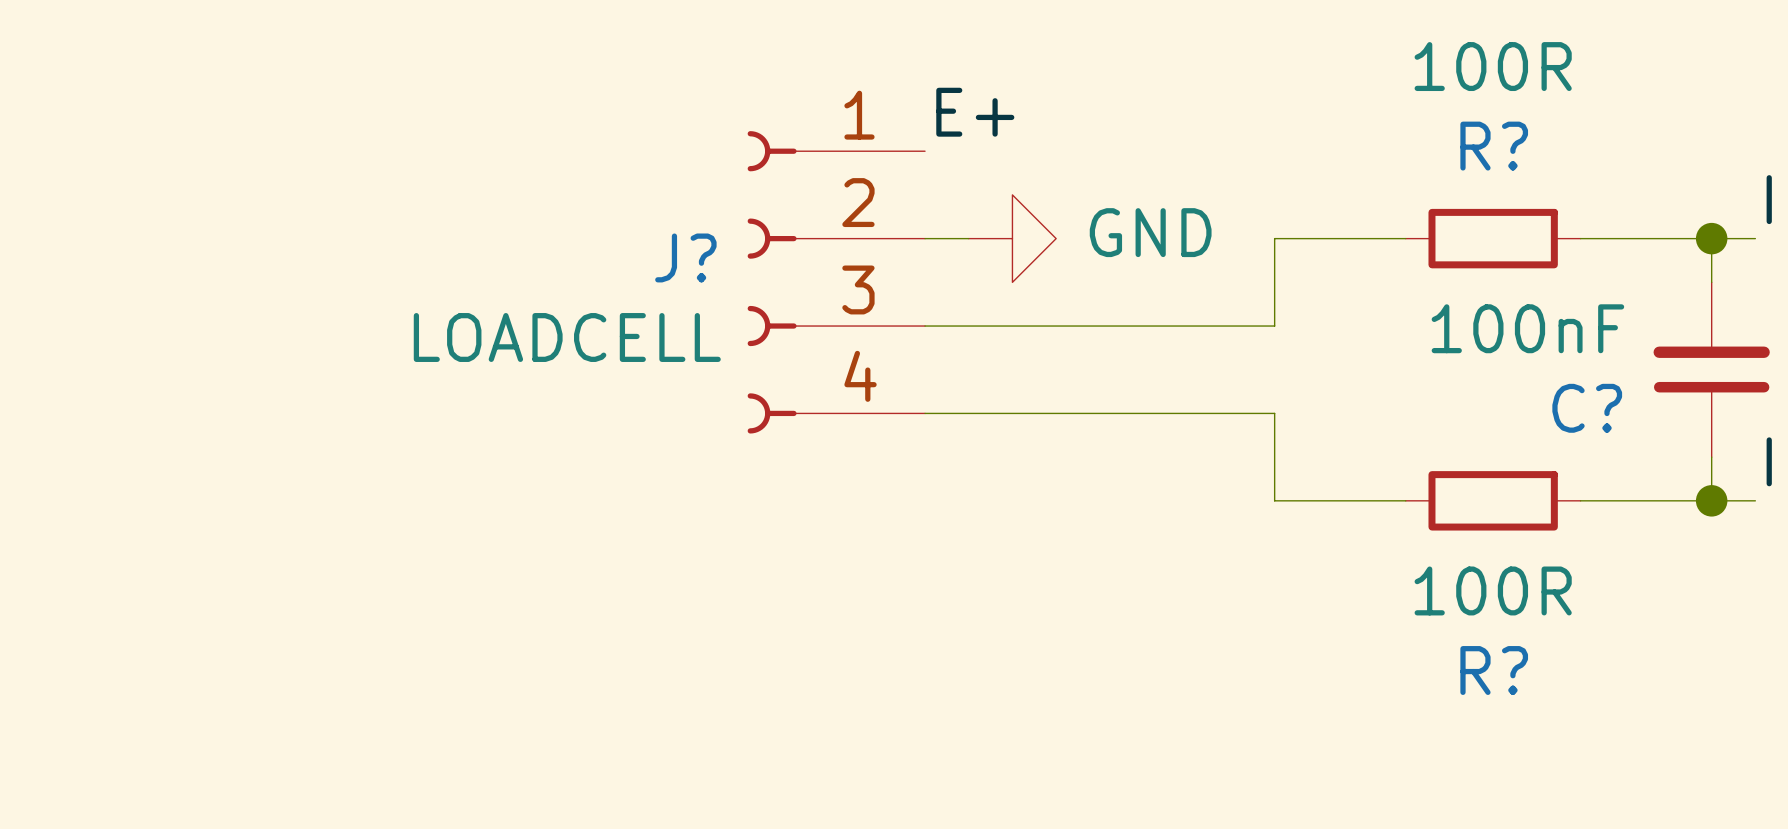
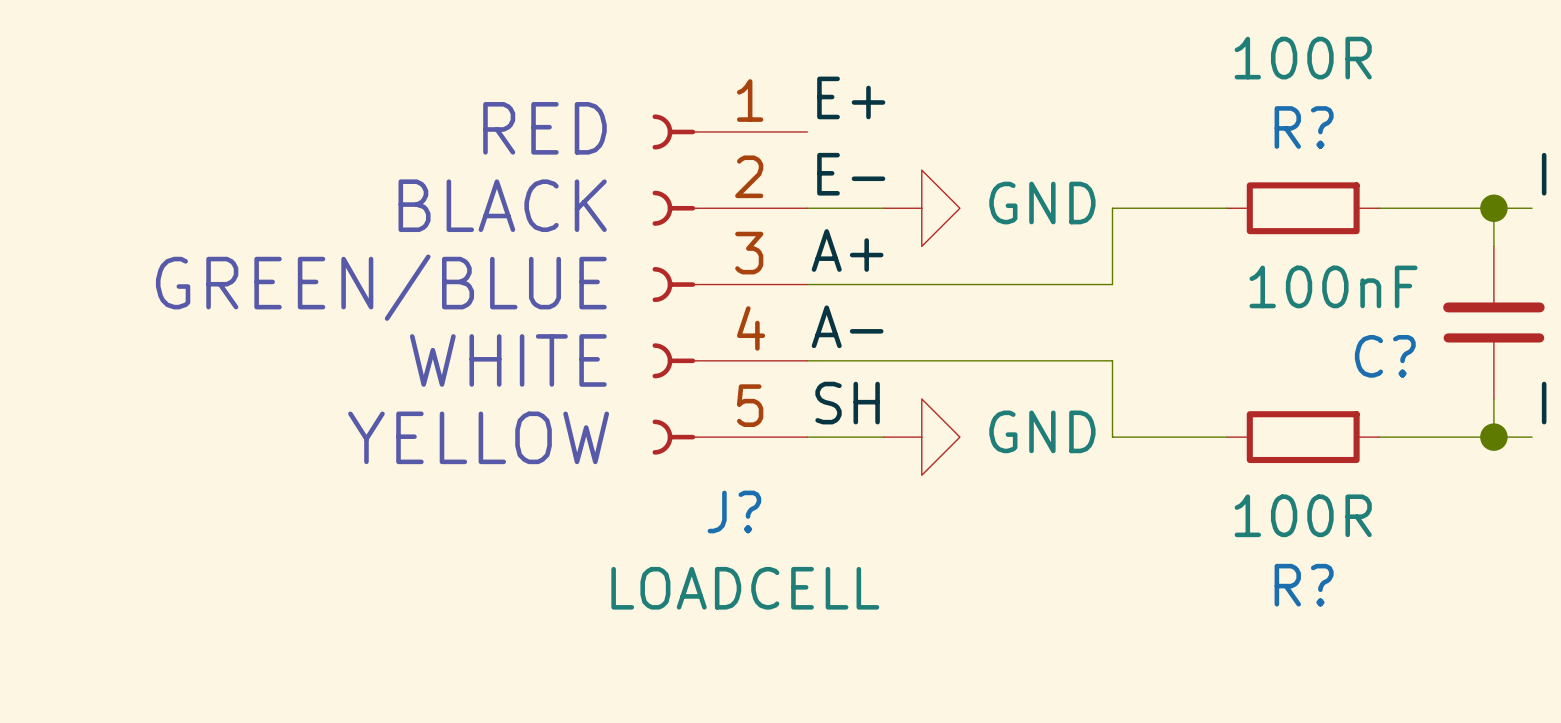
text: none -> RED (544, 128)
label: none -> E- (851, 174)
text: none -> BLACK (502, 205)
power symbol position: GND (1012, 238) -> GND (921, 208)
J?: LOADCELL (836, 282) -> none
label: none -> A+ (847, 250)
J?: none -> LOADCELL (729, 284)
text: none -> GREEN/BLUE (381, 287)
label: none -> A- (847, 326)
text: none -> WHITE (508, 360)
label: none -> SH (847, 403)
wire: none -> (807, 437) (883, 437)
power symbol: none -> GND (921, 437)
text: none -> YELLOW (478, 437)

